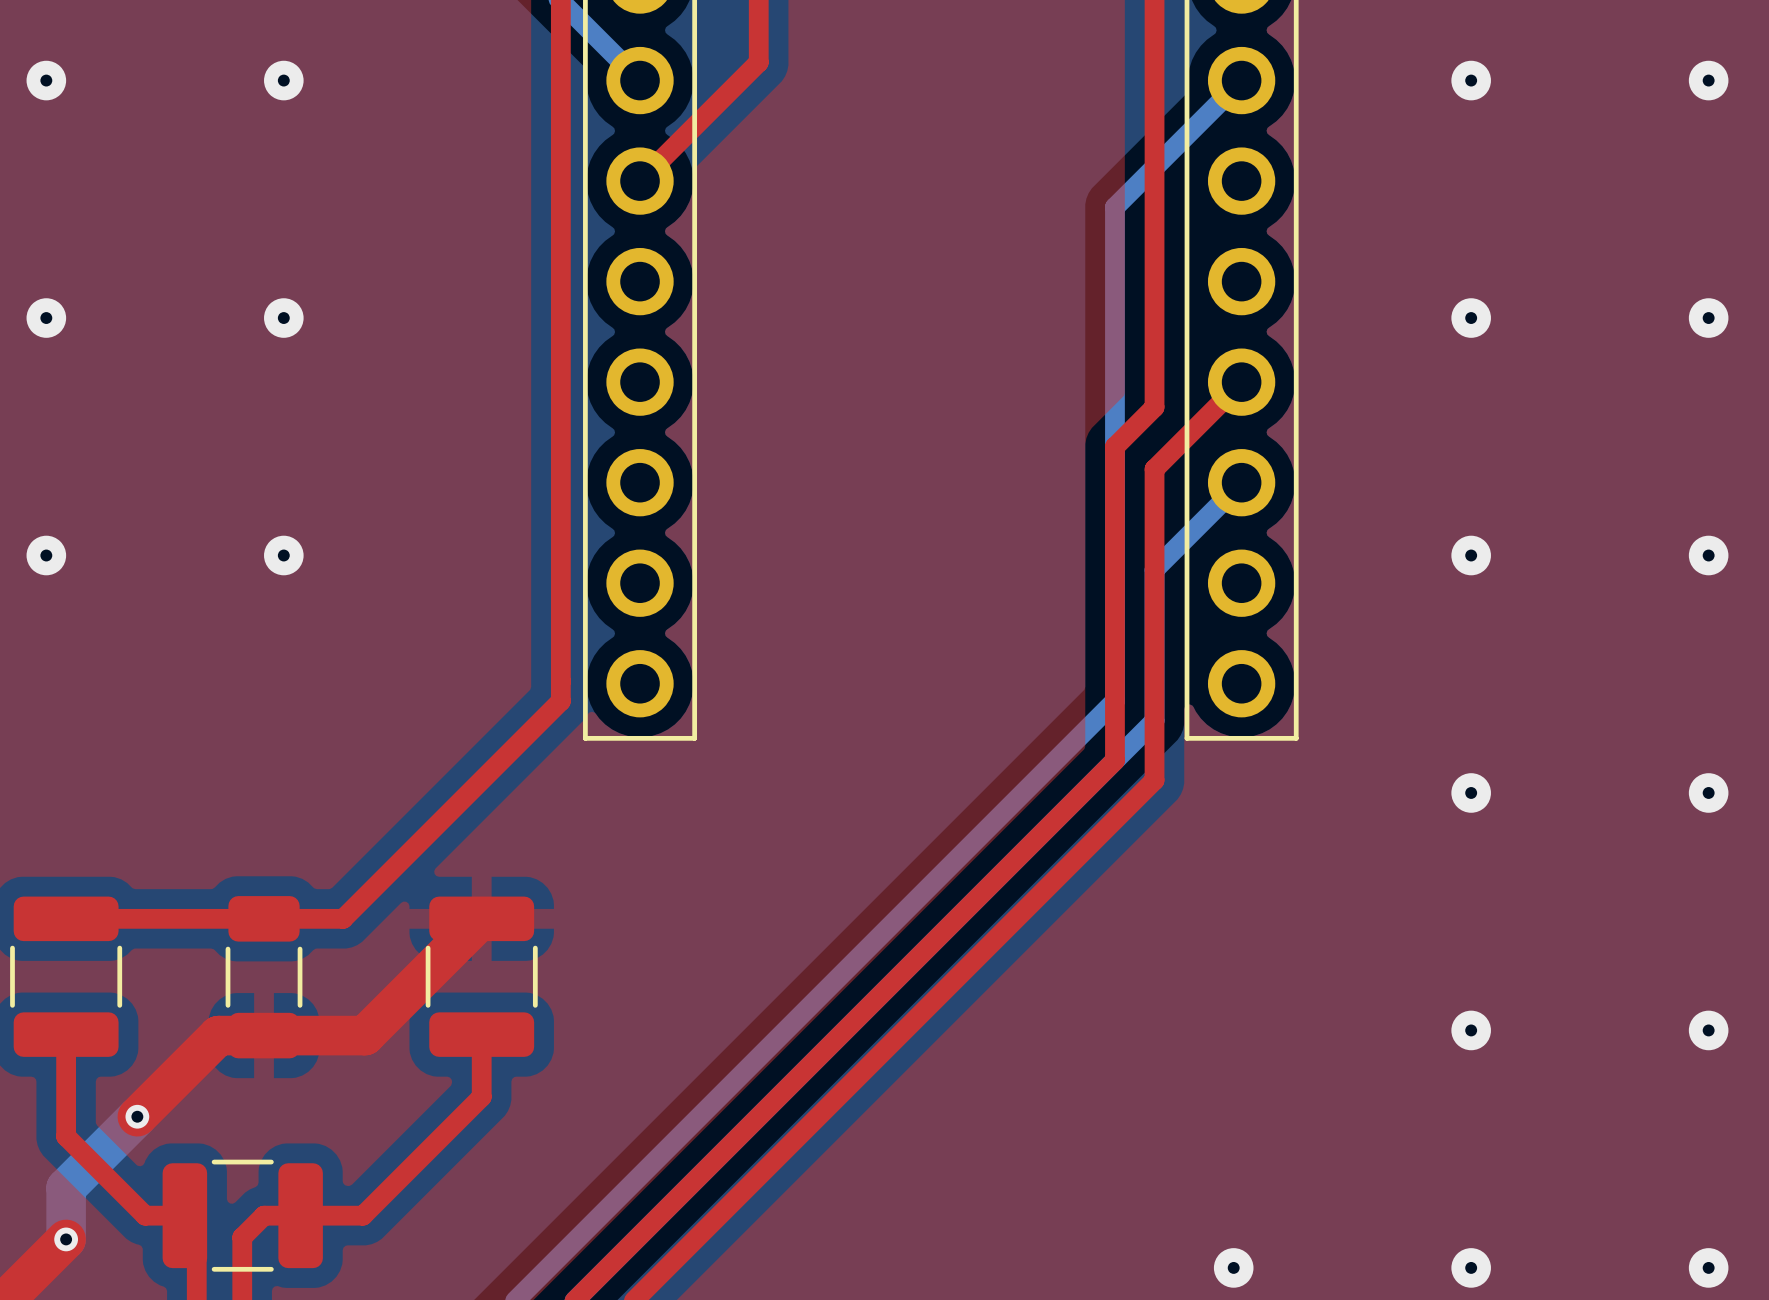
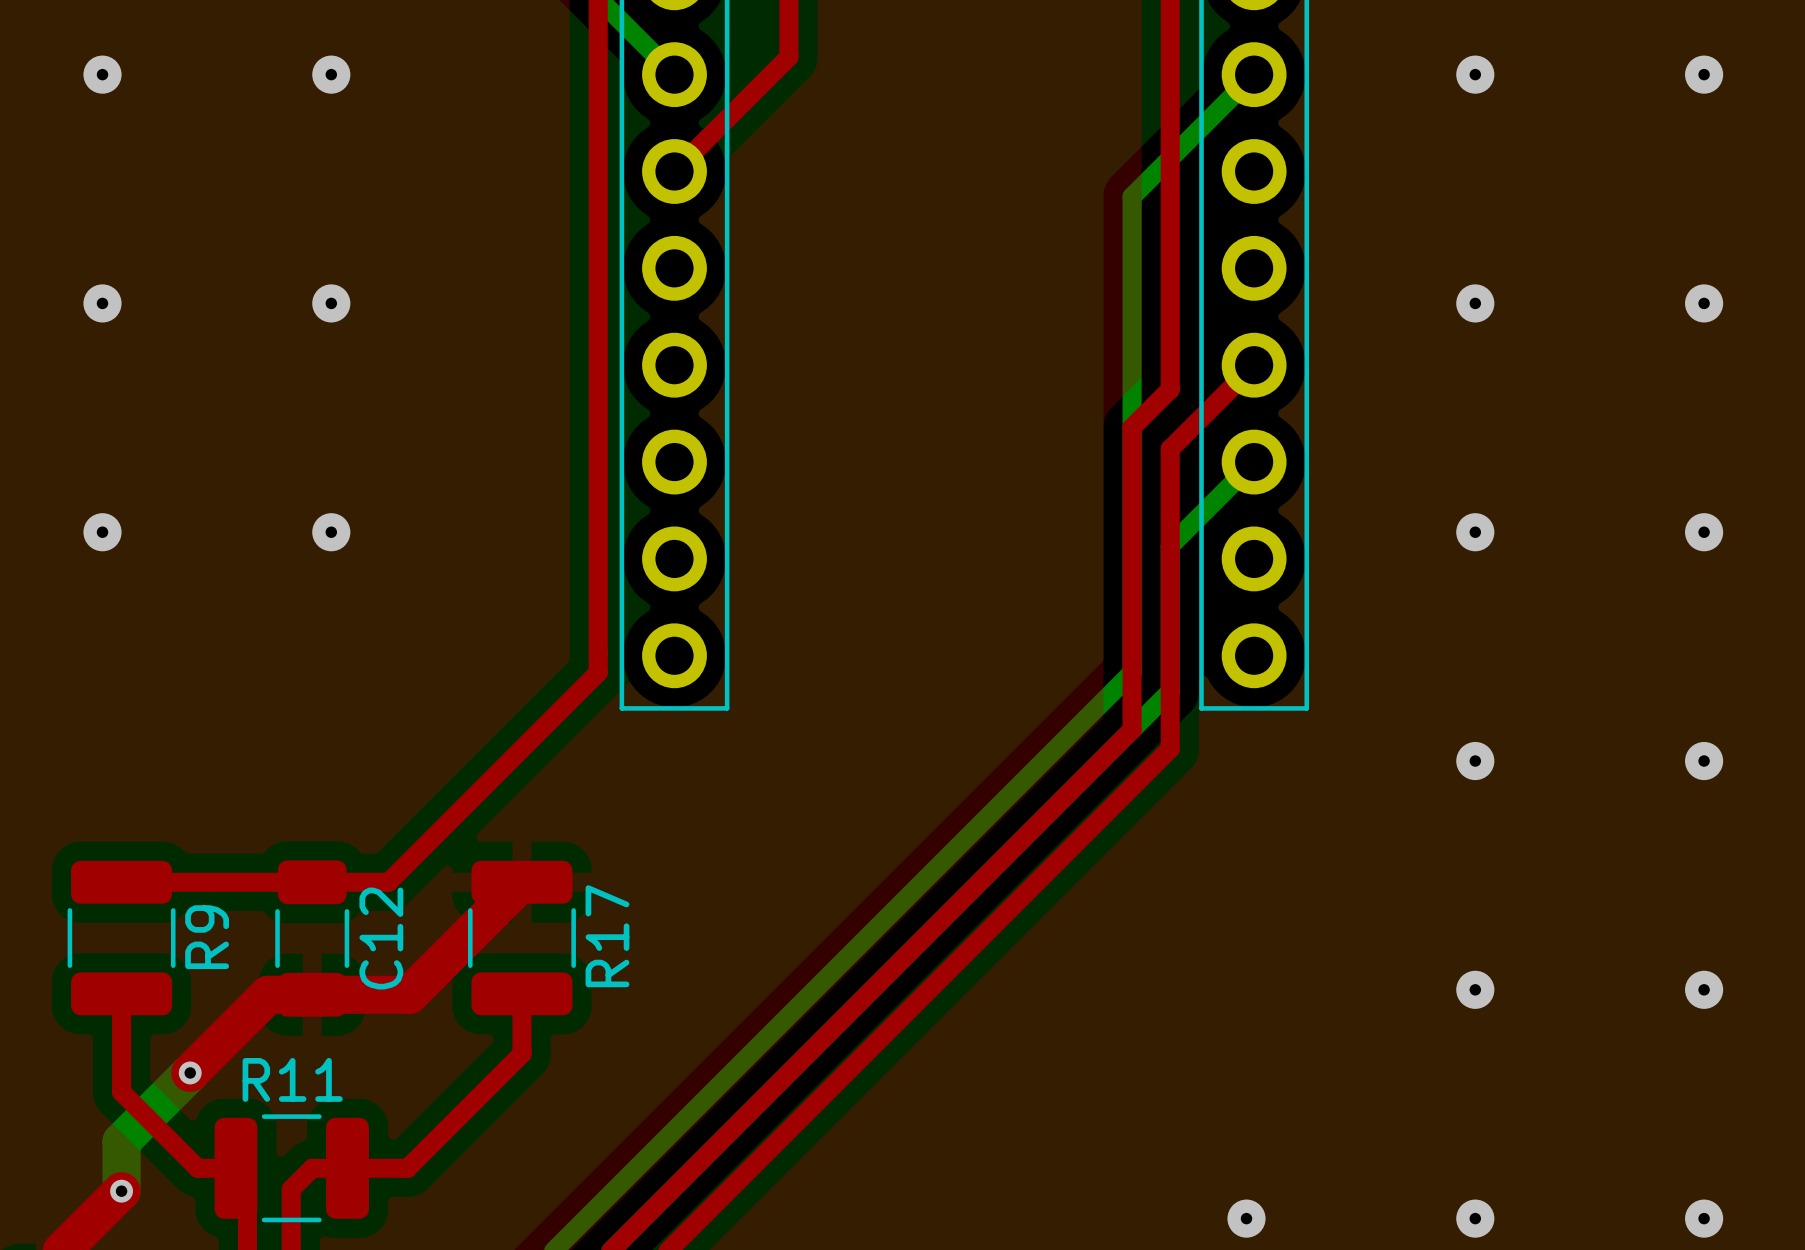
R17 name: none -> R17 (607, 936)
R9 name: none -> R9 (207, 937)
C12 name: none -> C12 (381, 938)
R11 name: none -> R11 (292, 1079)

